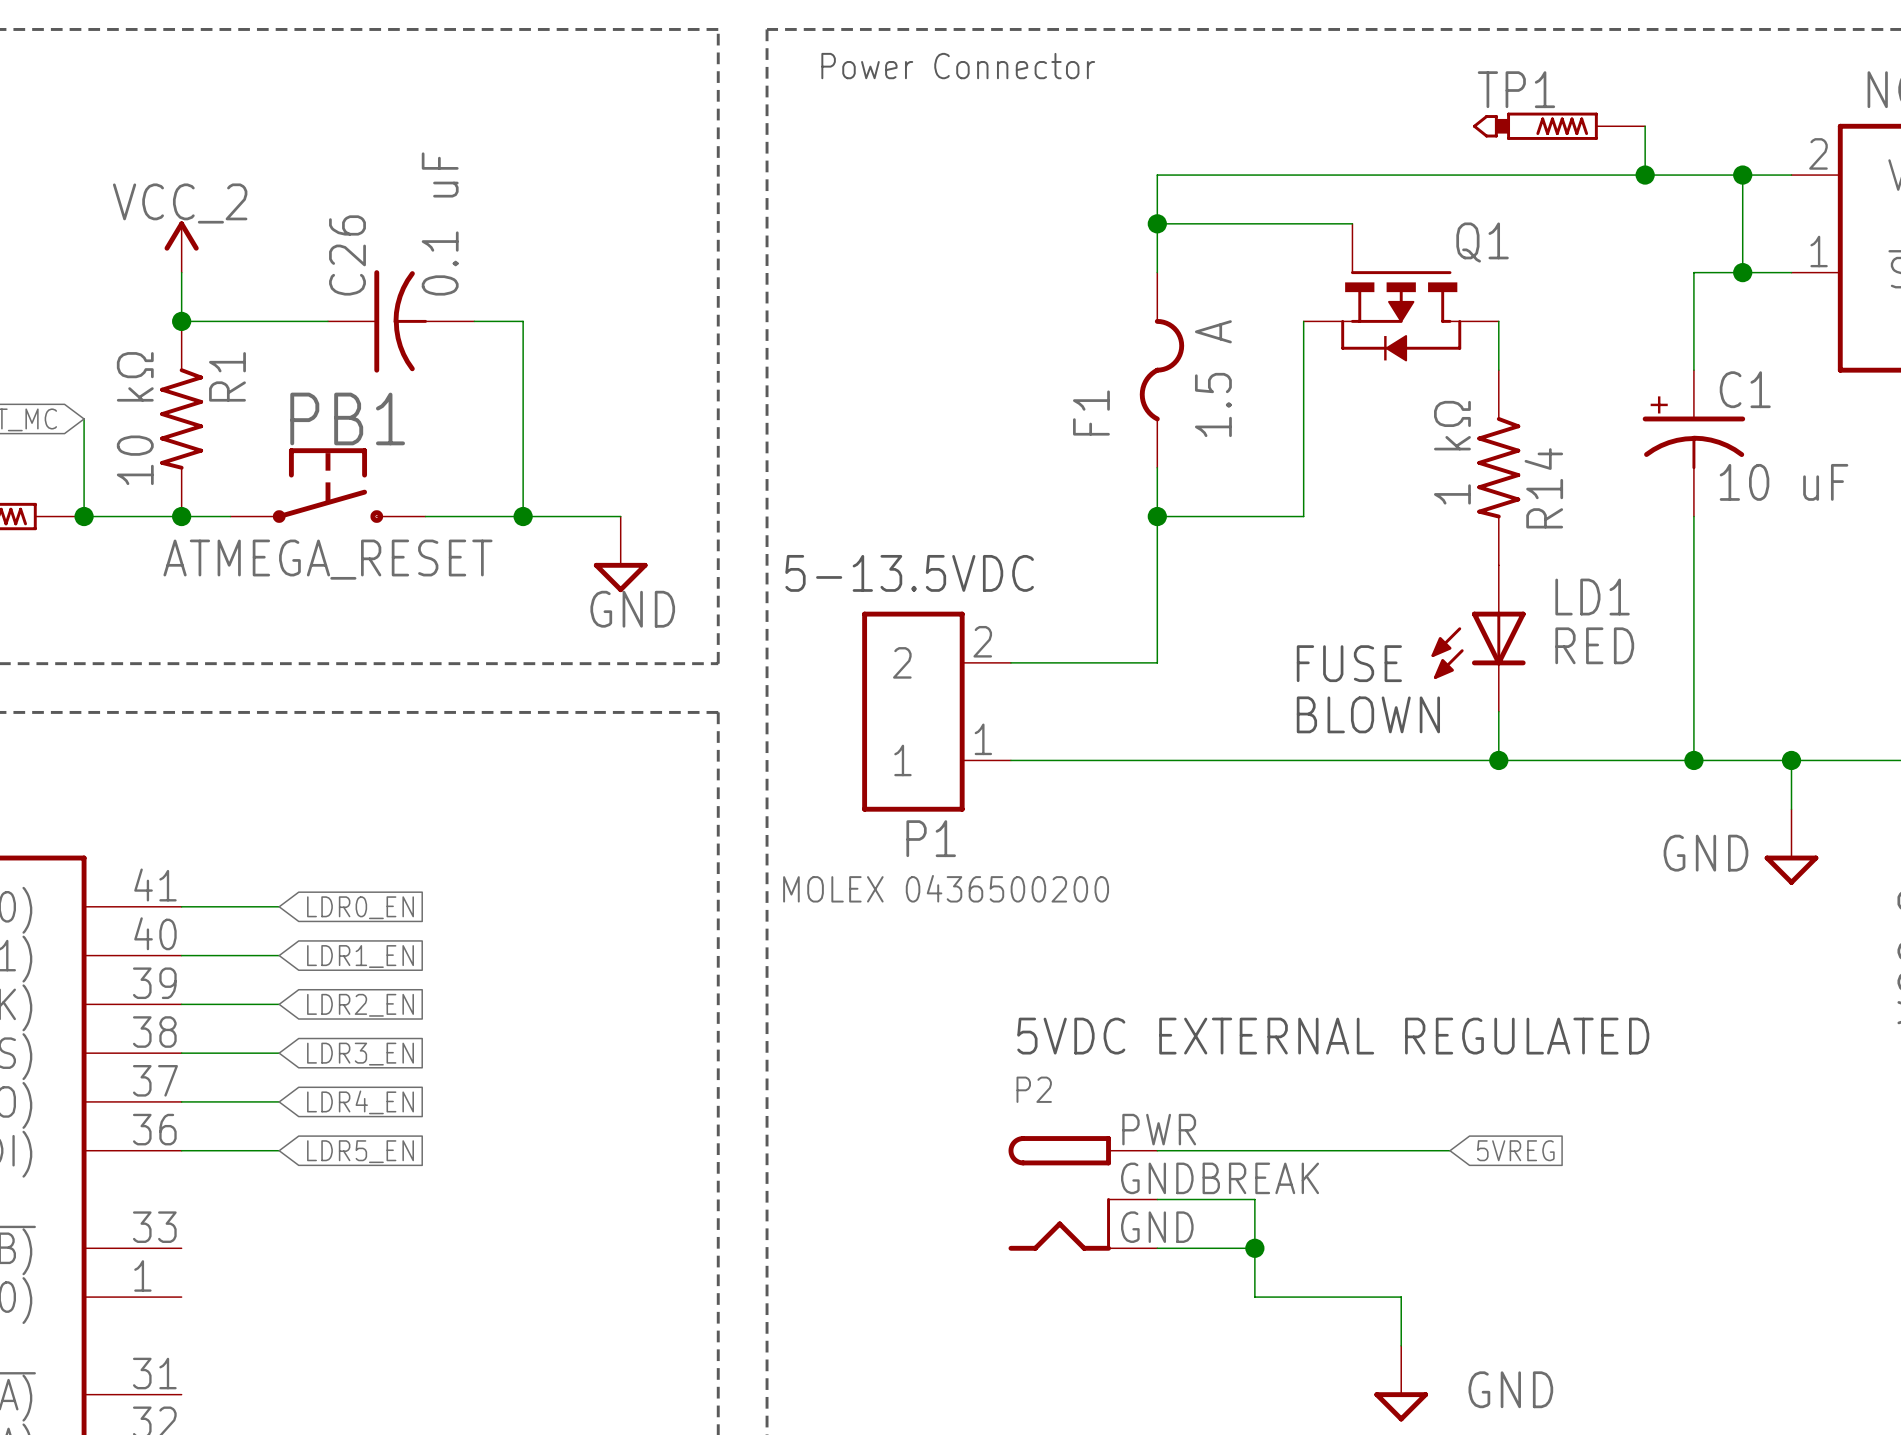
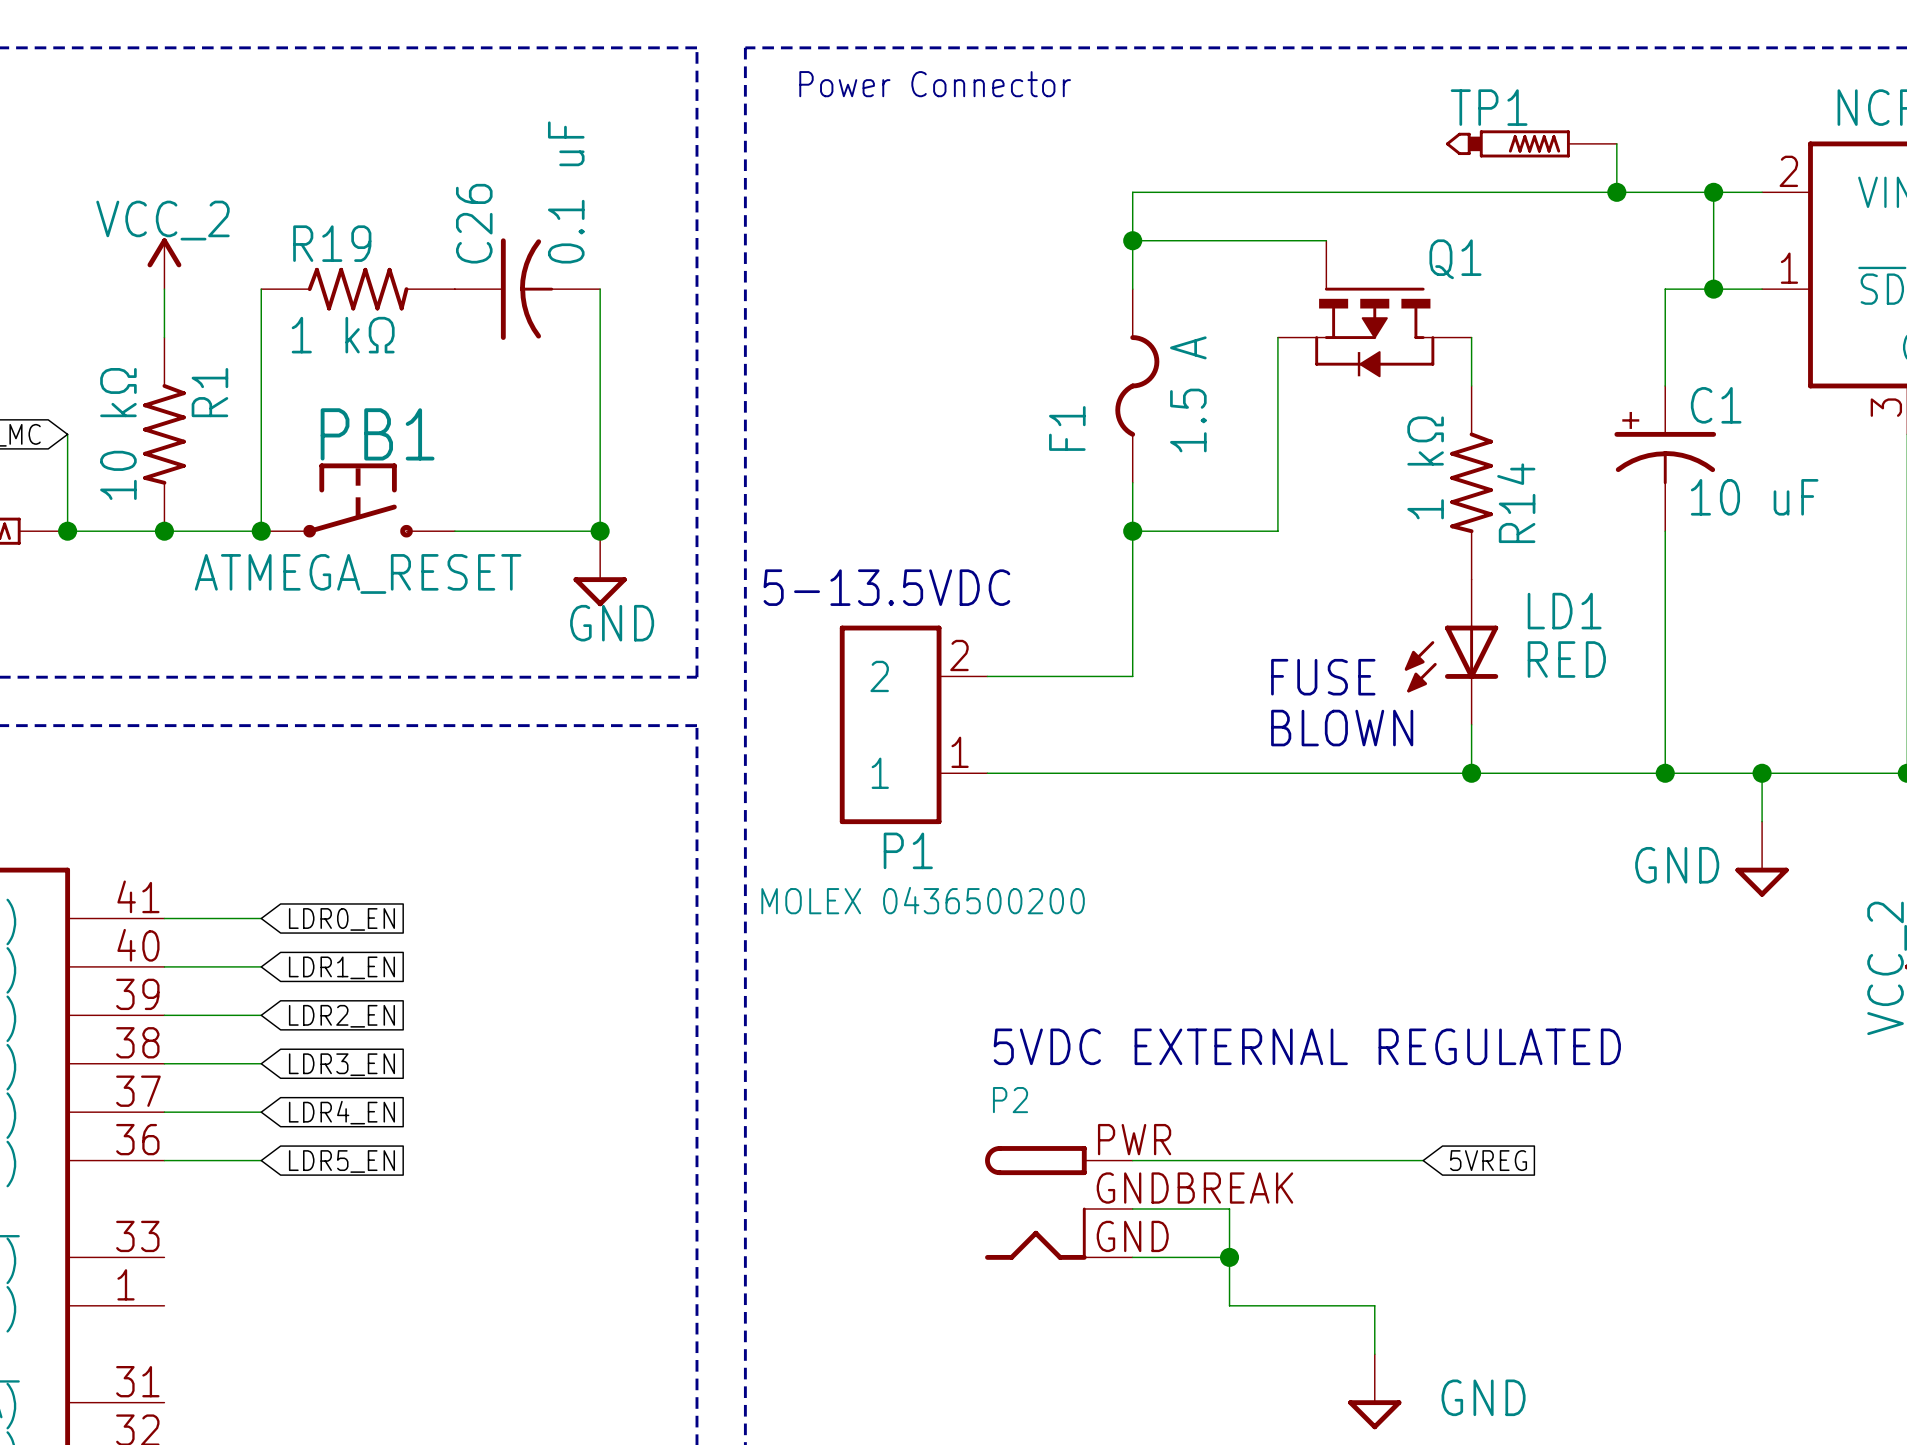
wire: none -> (261, 289) (261, 531) (212, 531)
R19: none -> 1 kΩ (358, 289)
wire: none -> (600, 289) (600, 531)
wire: (181, 321) (327, 321) -> none
junction: (181, 321) -> none
C26 position: (401, 321) -> (527, 289)
wire: (474, 321) (523, 321) (523, 516) -> none
PB1 position: (327, 485) -> (358, 500)
junction: none -> (261, 531)
junction position: (523, 516) -> (600, 531)

